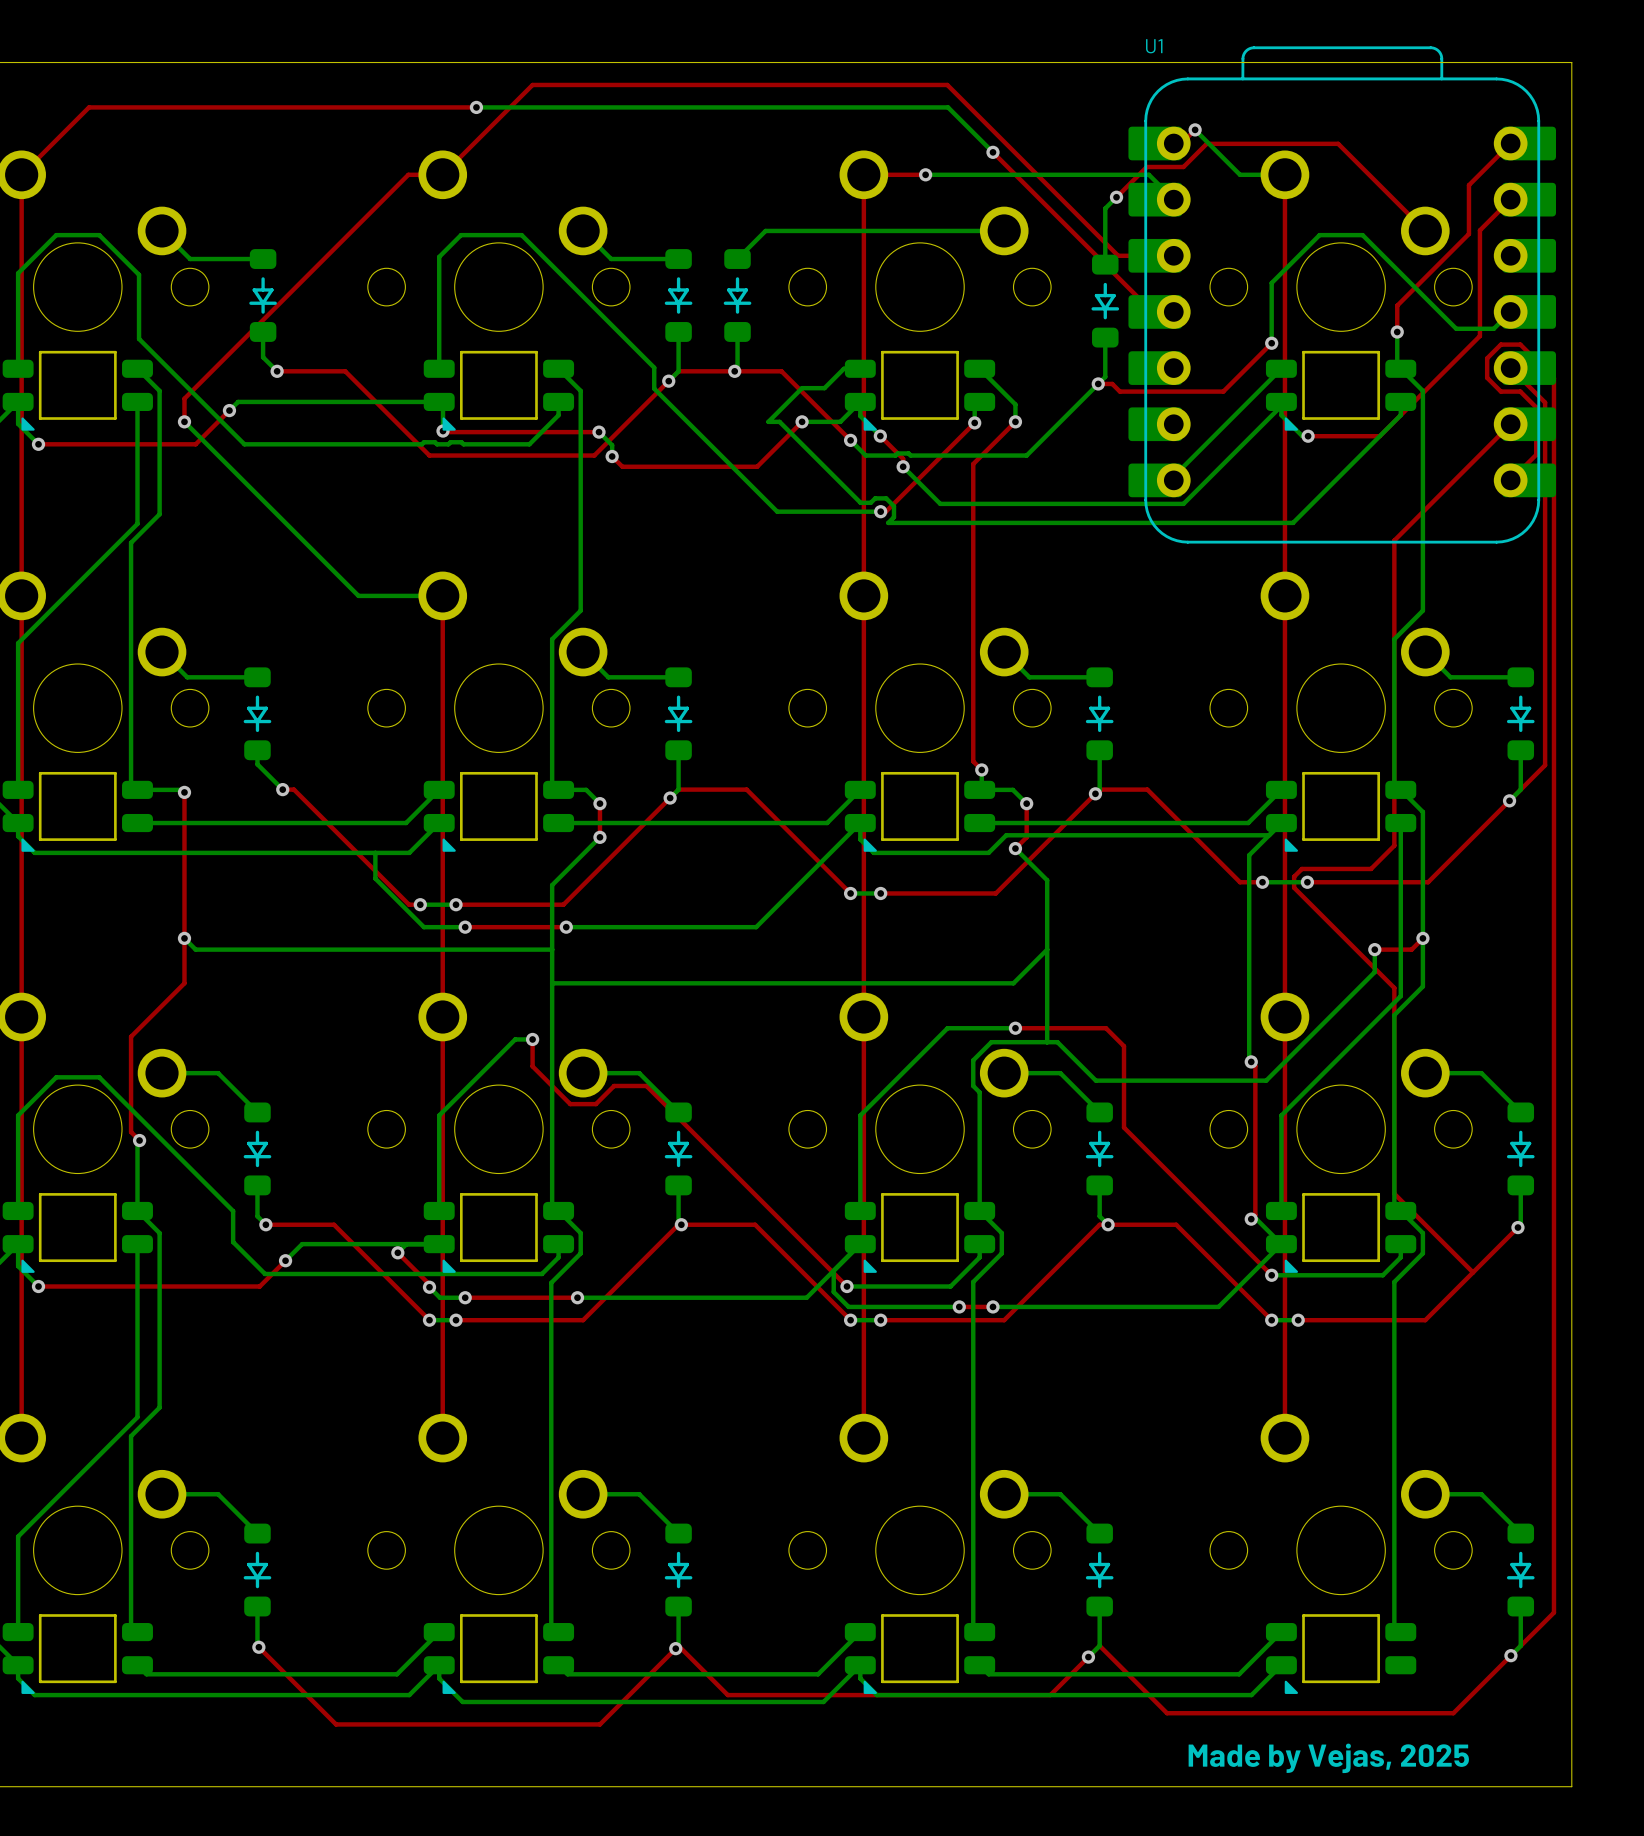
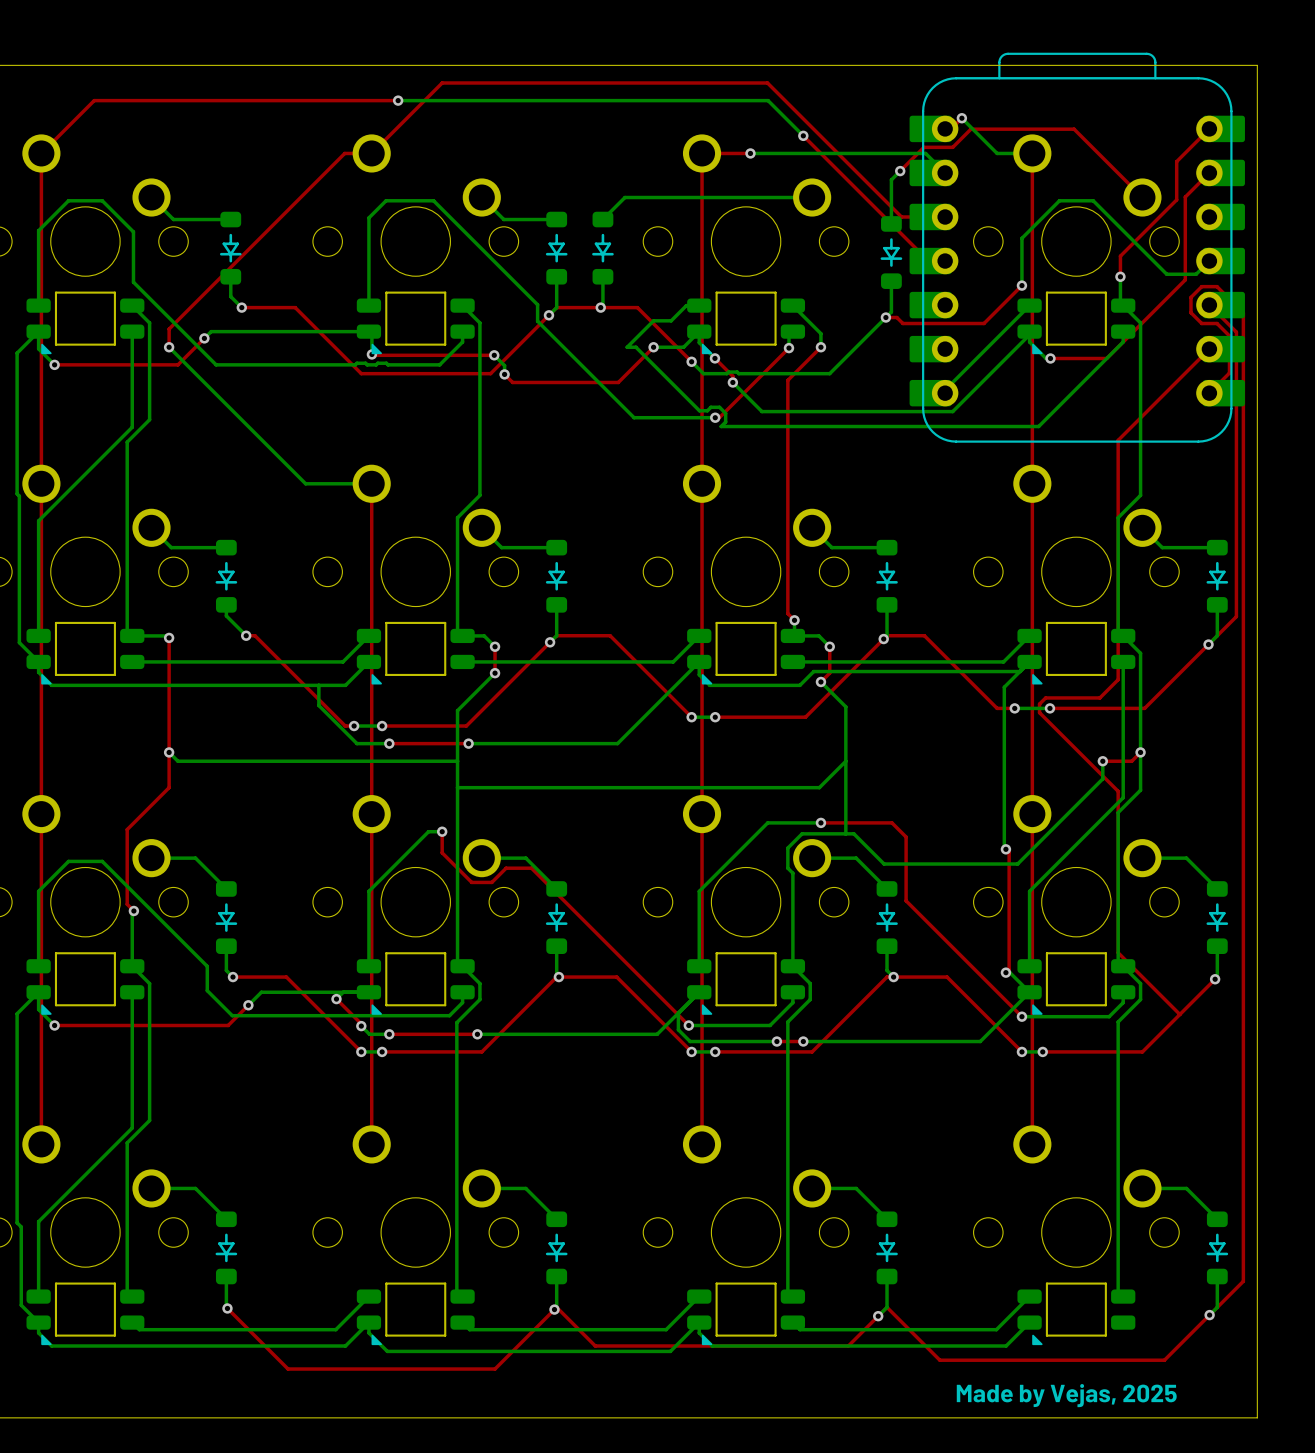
U1 name: U1 (1154, 46) -> none

